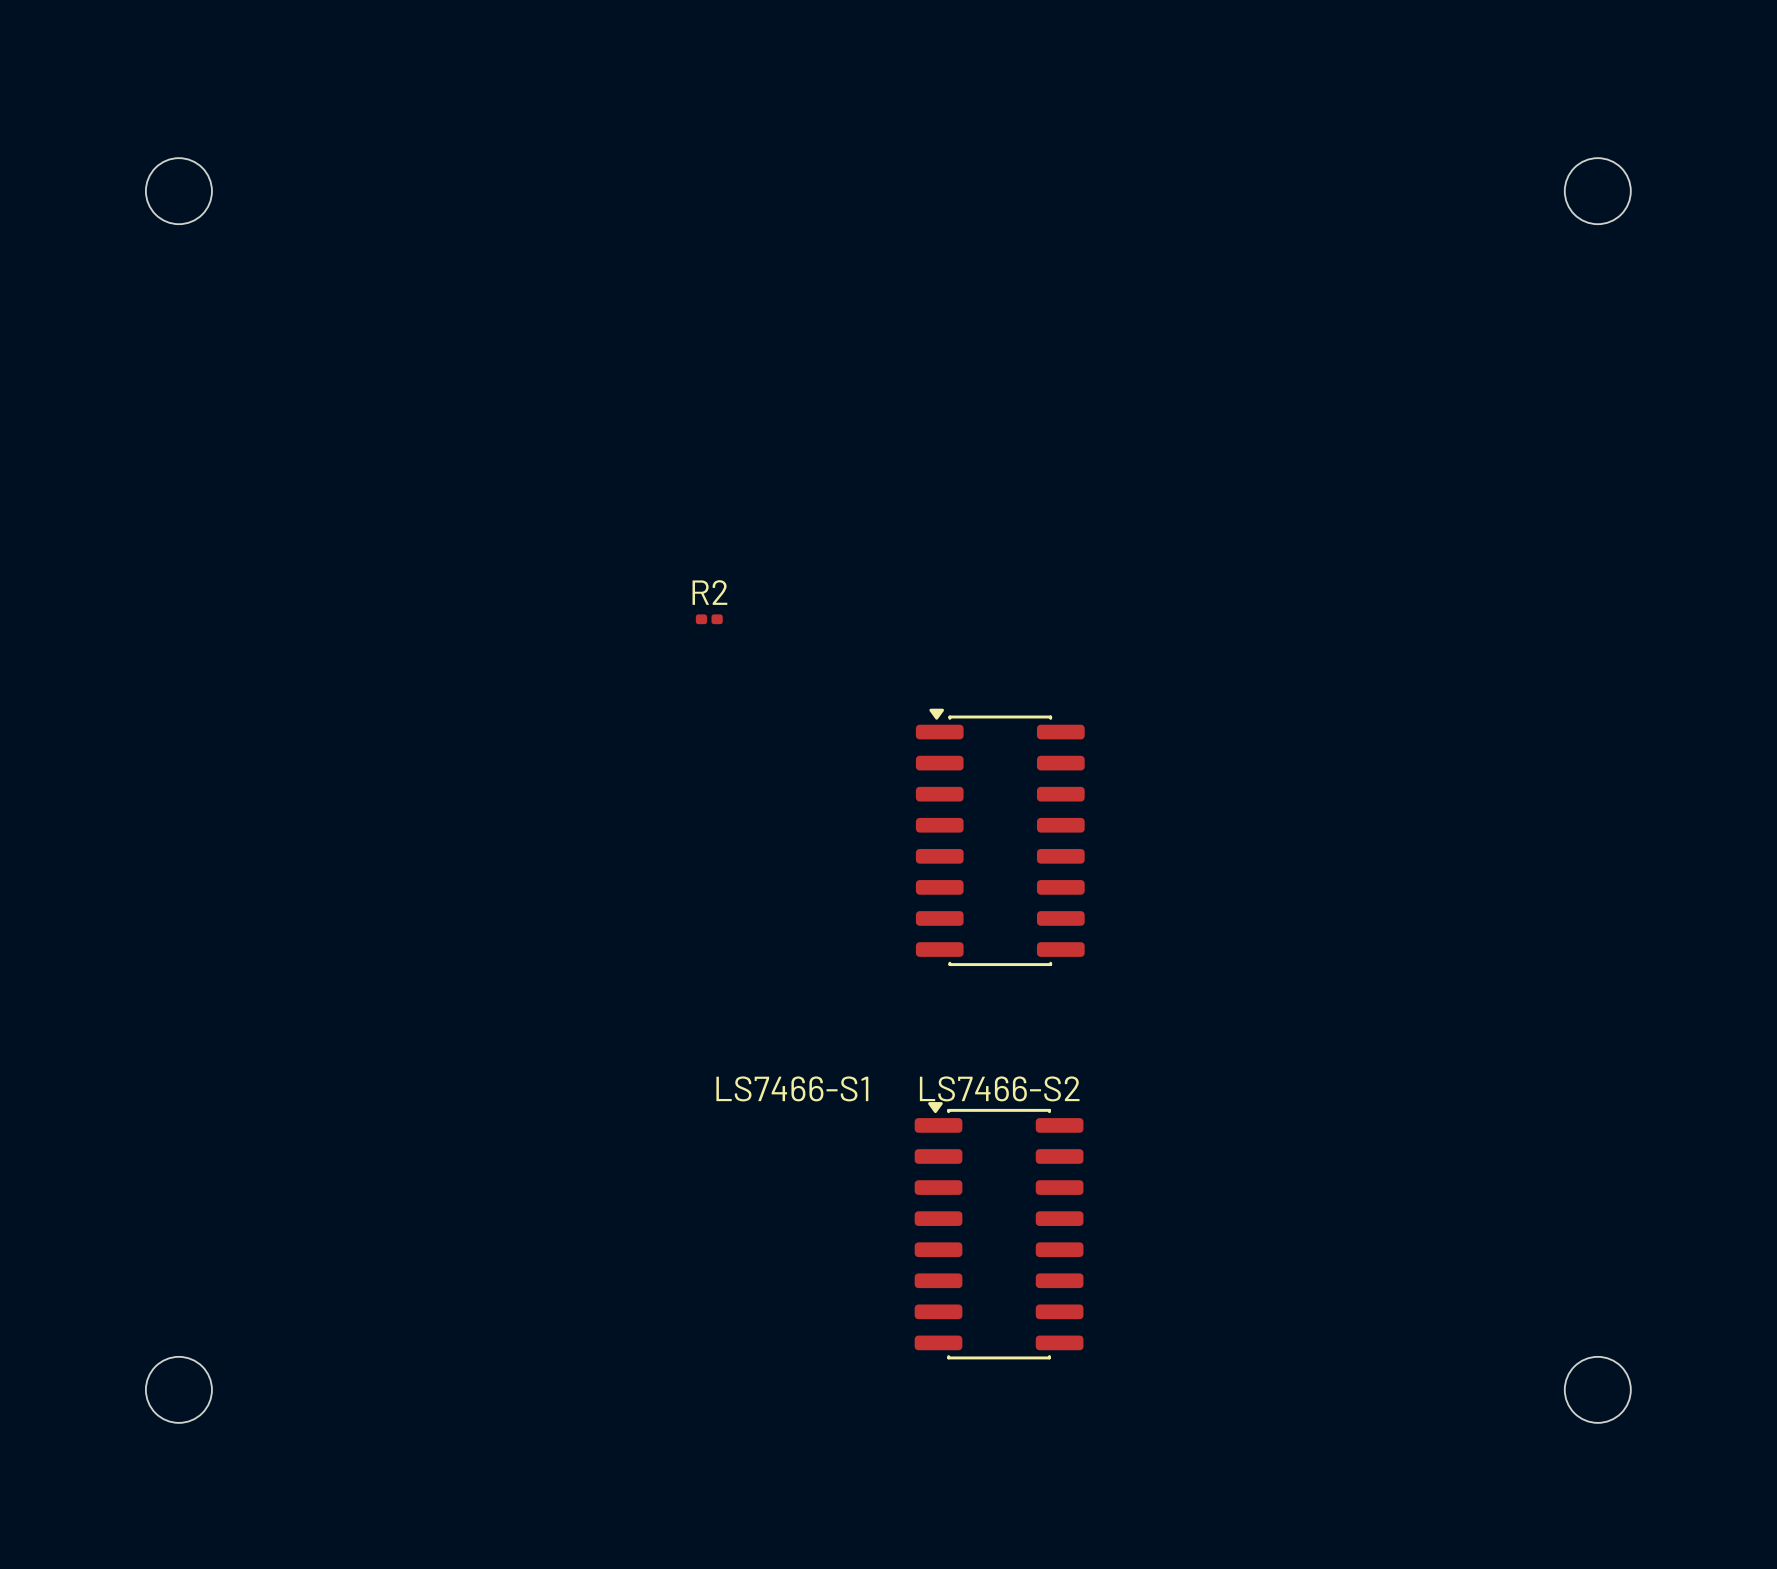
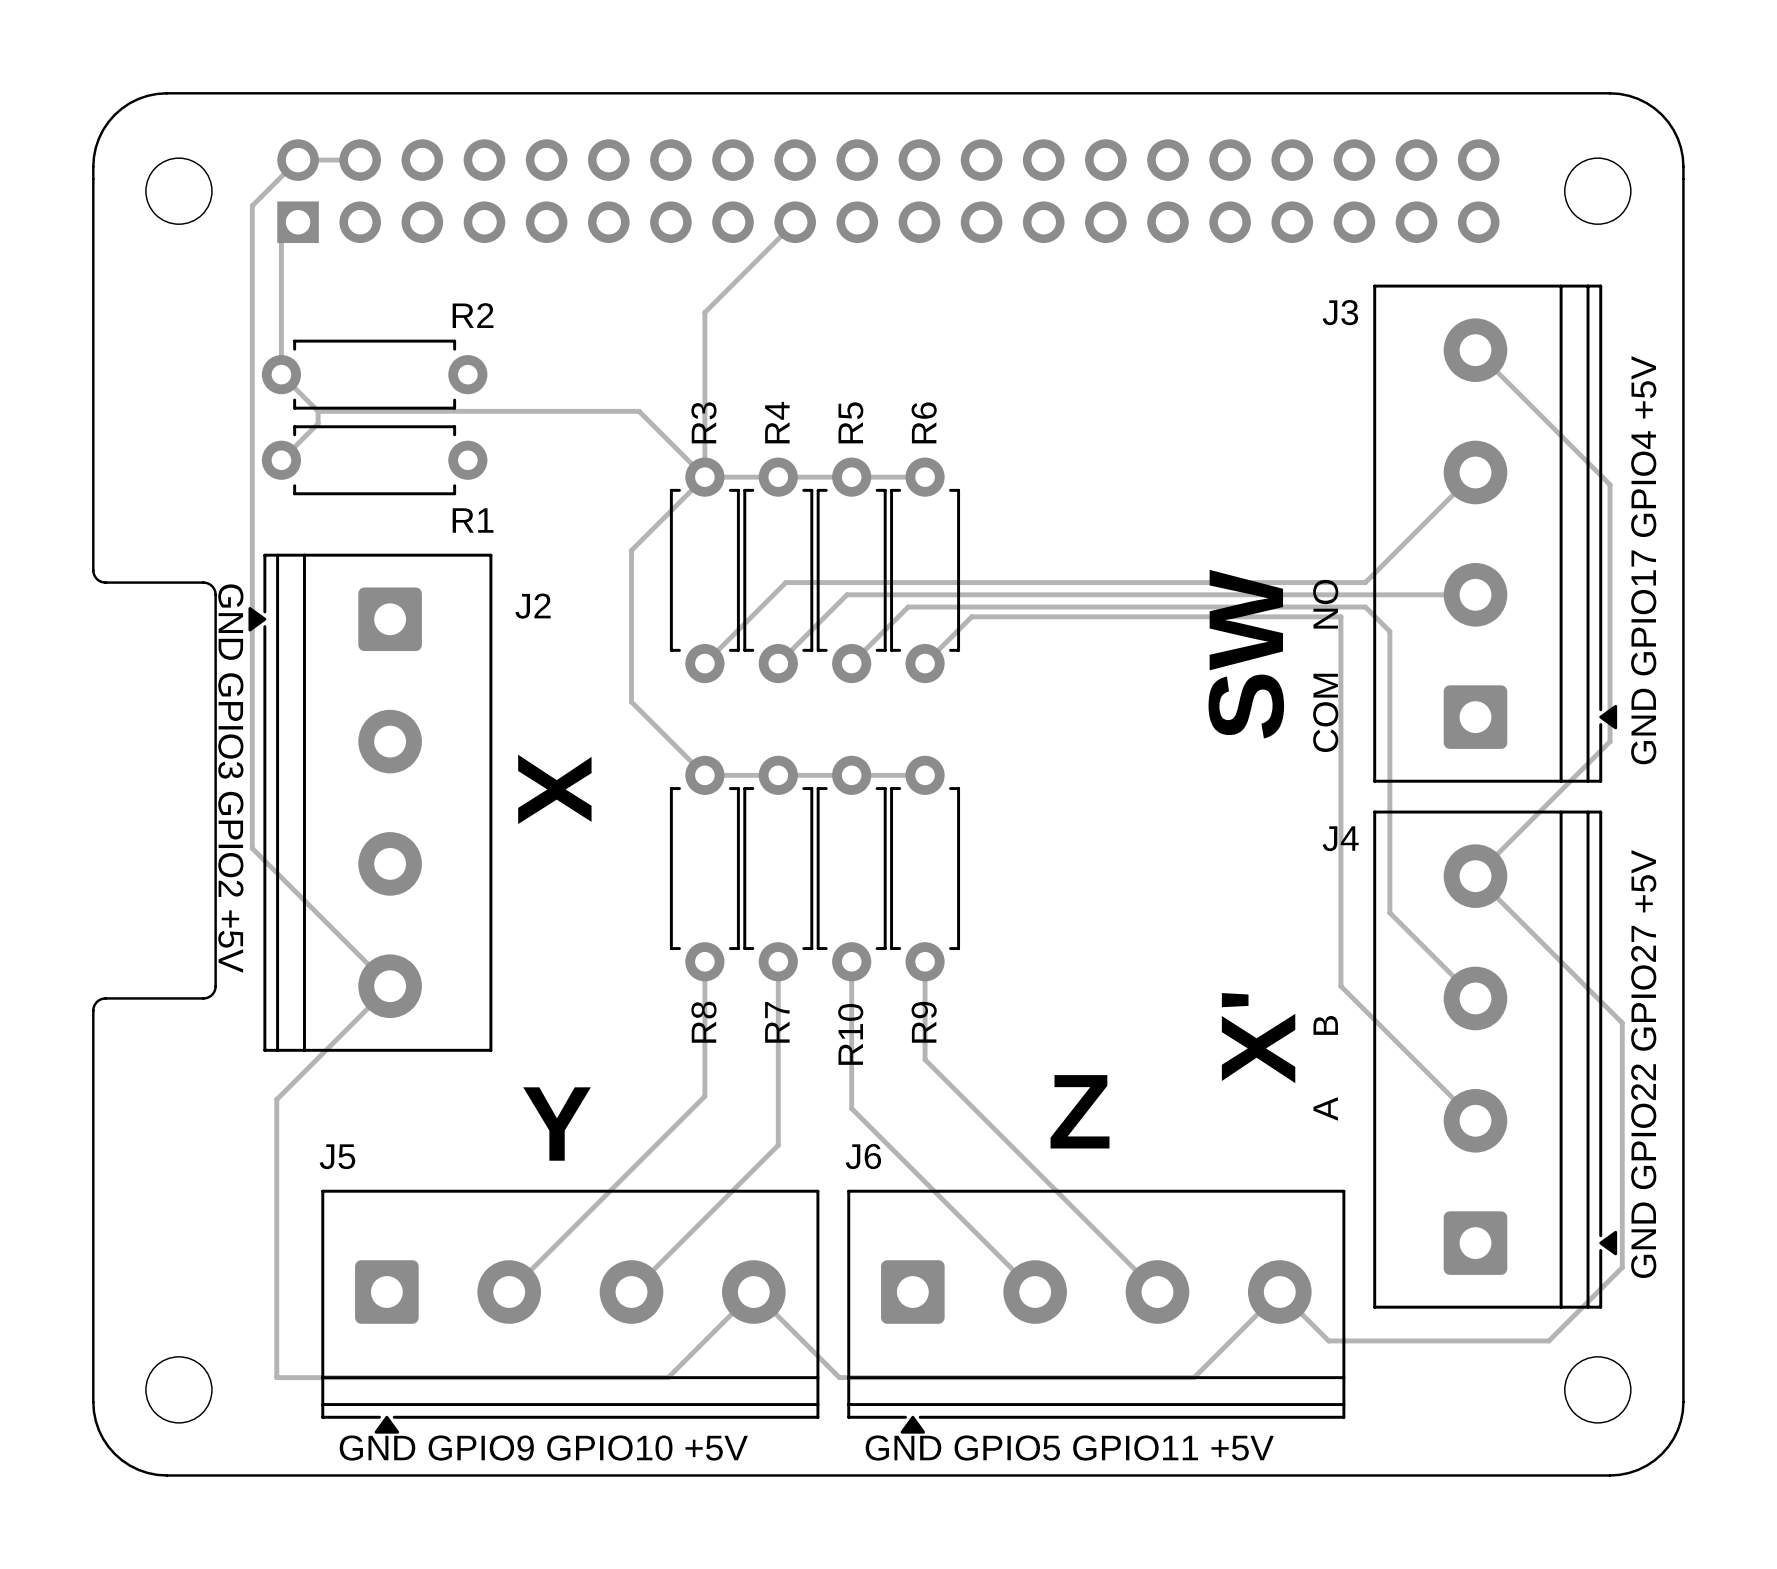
board edge: none -> (166, 93) (1610, 93) (1638, 98) (1661, 114) (1677, 138) (1683, 166) (1683, 1402) (1677, 1430) (1661, 1453) (1638, 1469) (1610, 1475) (166, 1475) (138, 1469) (114, 1453) (98, 1430) (93, 1402) (93, 1007) (96, 1002) (103, 998) (204, 998) (213, 993) (215, 986) (215, 591) (210, 585) (204, 582) (103, 582) (95, 577) (93, 570) (93, 157) (98, 138) (114, 114) (138, 98) (166, 93)
track: none -> (360, 160) (298, 160) (252, 205) (252, 848) (390, 986) (276, 1099) (276, 1377) (668, 1377) (753, 1292) (839, 1377) (1194, 1377) (1279, 1292) (1328, 1340) (1548, 1340) (1622, 1267) (1622, 1022) (1475, 876) (1610, 741) (1610, 484) (1475, 350)
part: none -> (888, 191)
track: none -> (298, 222) (281, 238) (281, 374) (318, 411)
track: none -> (795, 222) (704, 312) (704, 477)
track: none -> (318, 411) (318, 423) (281, 460)
track: none -> (318, 411) (639, 411) (704, 477)
R1: none -> (374, 460)
track: none -> (1475, 472) (1365, 582) (785, 582) (704, 663)
track: none -> (704, 477) (925, 477)
track: none -> (704, 477) (631, 550) (631, 701) (704, 775) (925, 775)
J3: none -> (1495, 533)
R3: none -> (704, 570)
R4: none -> (778, 570)
R5: none -> (851, 570)
R6: none -> (925, 570)
R2 name position: R2 (709, 592) -> R2 (473, 315)
track: none -> (1475, 594) (847, 594) (778, 663)
text: none -> GND GPIO17 GPIO4 +5V (1643, 560)
text: none -> NO (1325, 604)
R2 footprint: [695, 614, 723, 625] -> [261, 339, 488, 410]
track: none -> (851, 663) (908, 607) (1365, 607) (1389, 631) (1389, 912) (1475, 998)
track: none -> (925, 663) (971, 616) (1340, 616) (1340, 986) (1475, 1120)
text: none -> SW (1246, 654)
text: none -> COM (1325, 712)
text: none -> GND GPIO3 GPIO2 +5V (230, 778)
text: none -> X (554, 789)
J2: none -> (370, 802)
LS7466-S1: (1000, 837) -> none
R8: none -> (704, 868)
R7: none -> (778, 868)
R10: none -> (851, 868)
R9: none -> (925, 868)
track: none -> (704, 961) (704, 1096) (509, 1292)
track: none -> (778, 961) (778, 1145) (631, 1292)
track: none -> (851, 961) (851, 1108) (1035, 1292)
track: none -> (925, 961) (925, 1059) (1157, 1292)
text: none -> X' (1258, 1038)
J4: none -> (1495, 1059)
text: none -> A B (1325, 1068)
text: none -> GND GPIO22 GPIO27 +5V (1643, 1064)
text: none -> Z (1080, 1111)
text: none -> Y (557, 1124)
LS7466-S2: (999, 1230) -> none
J5: none -> (570, 1311)
J6: none -> (1096, 1311)
text: none -> GND GPIO9 GPIO10 +5V (543, 1448)
text: none -> GND GPIO5 GPIO11 +5V (1069, 1448)

